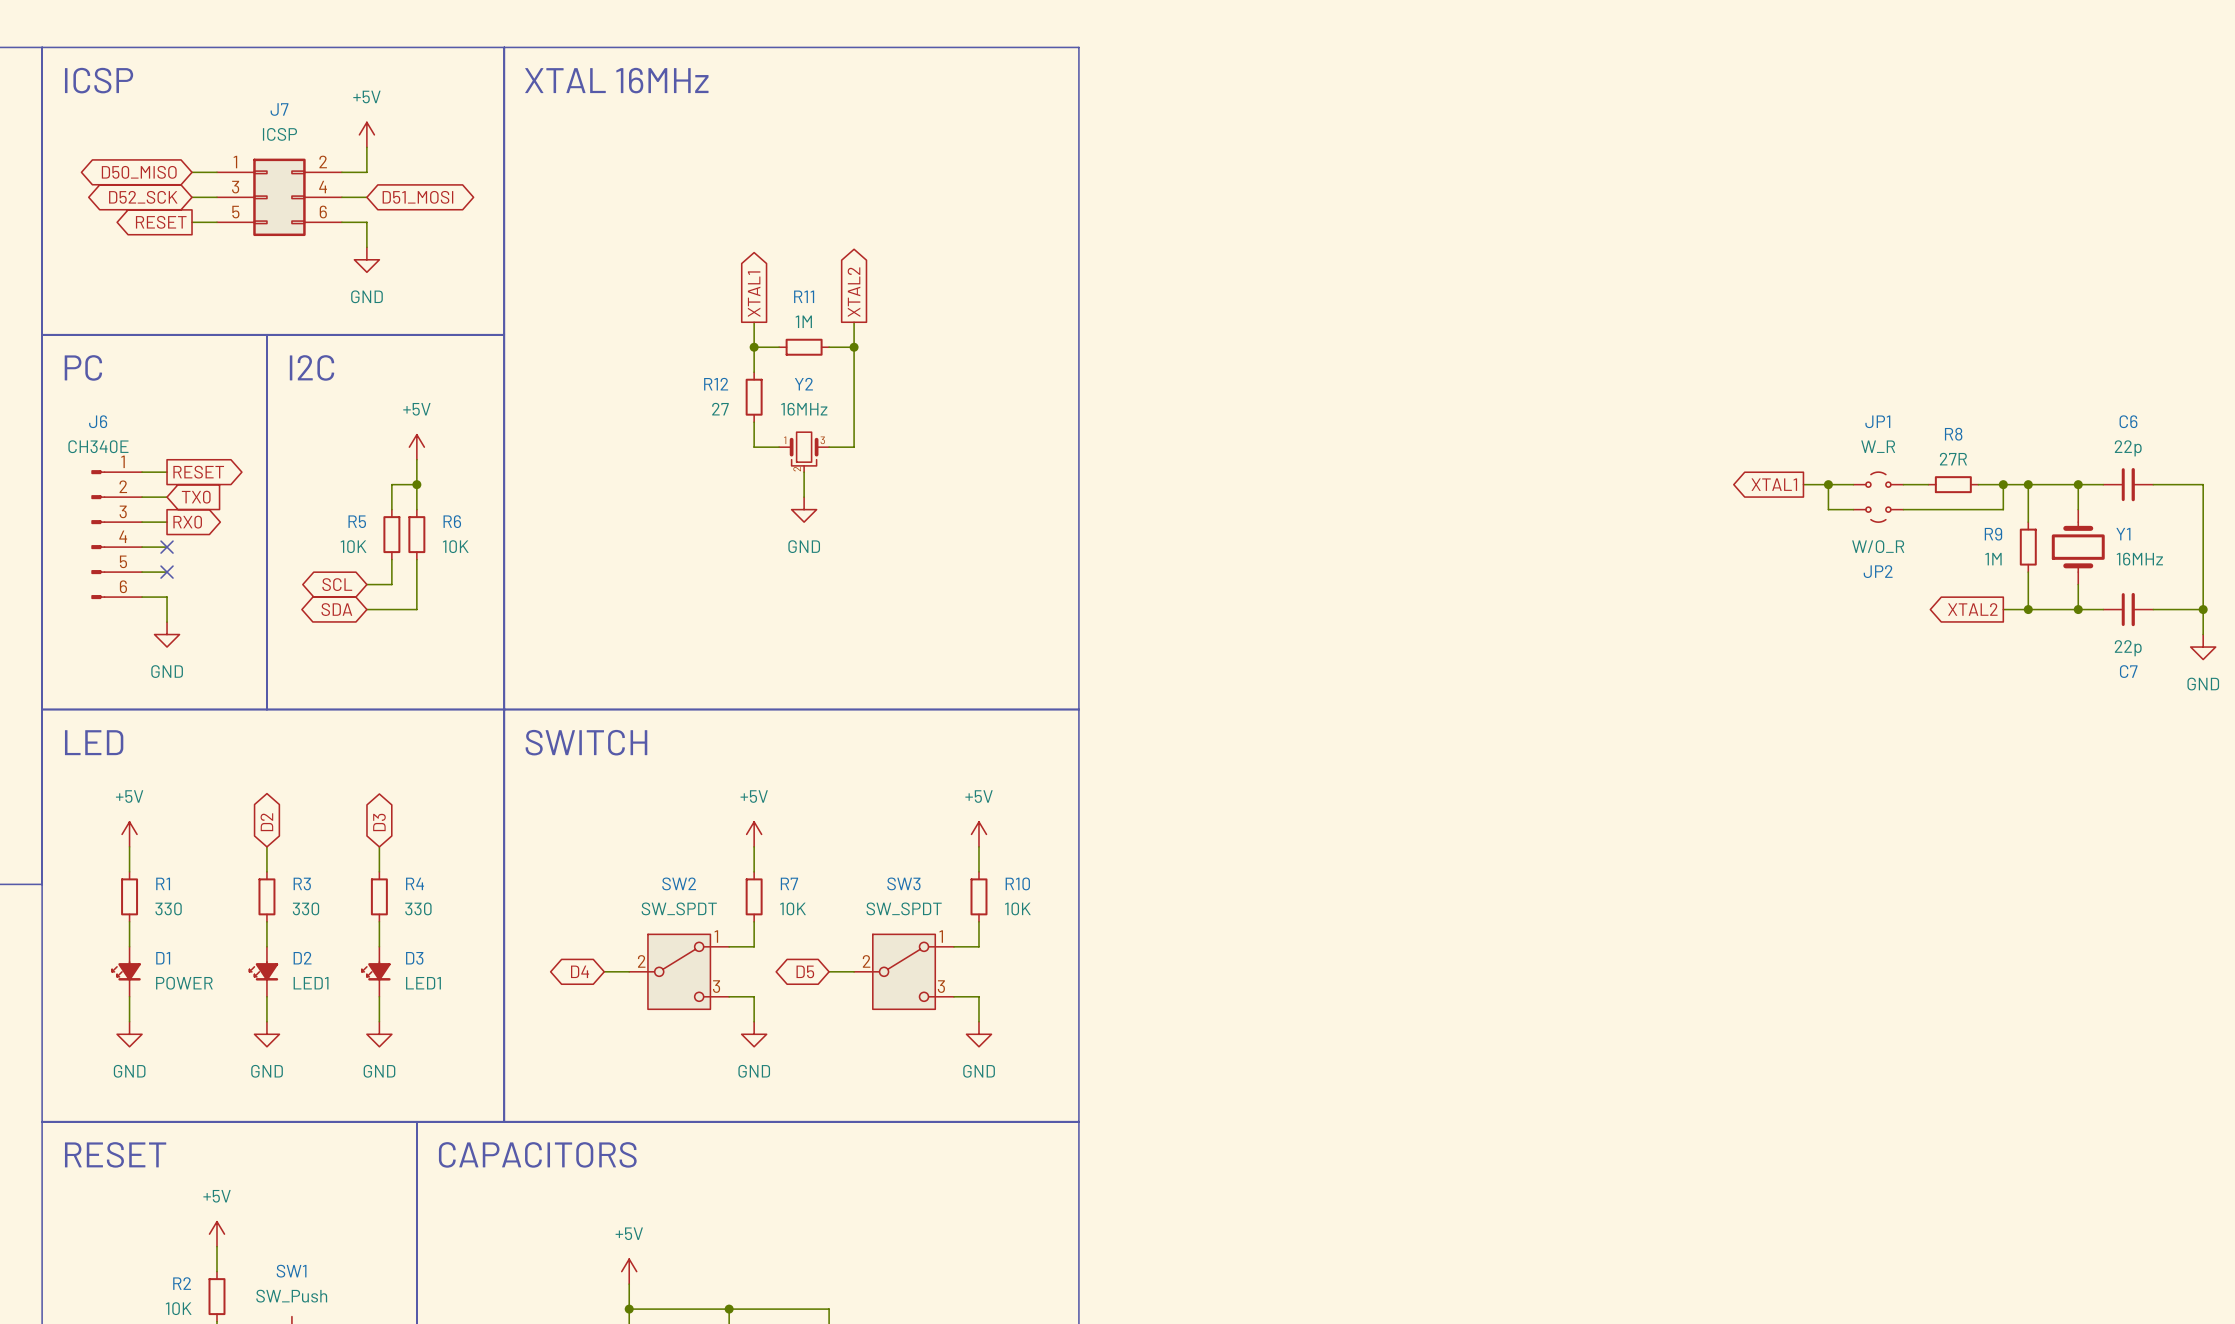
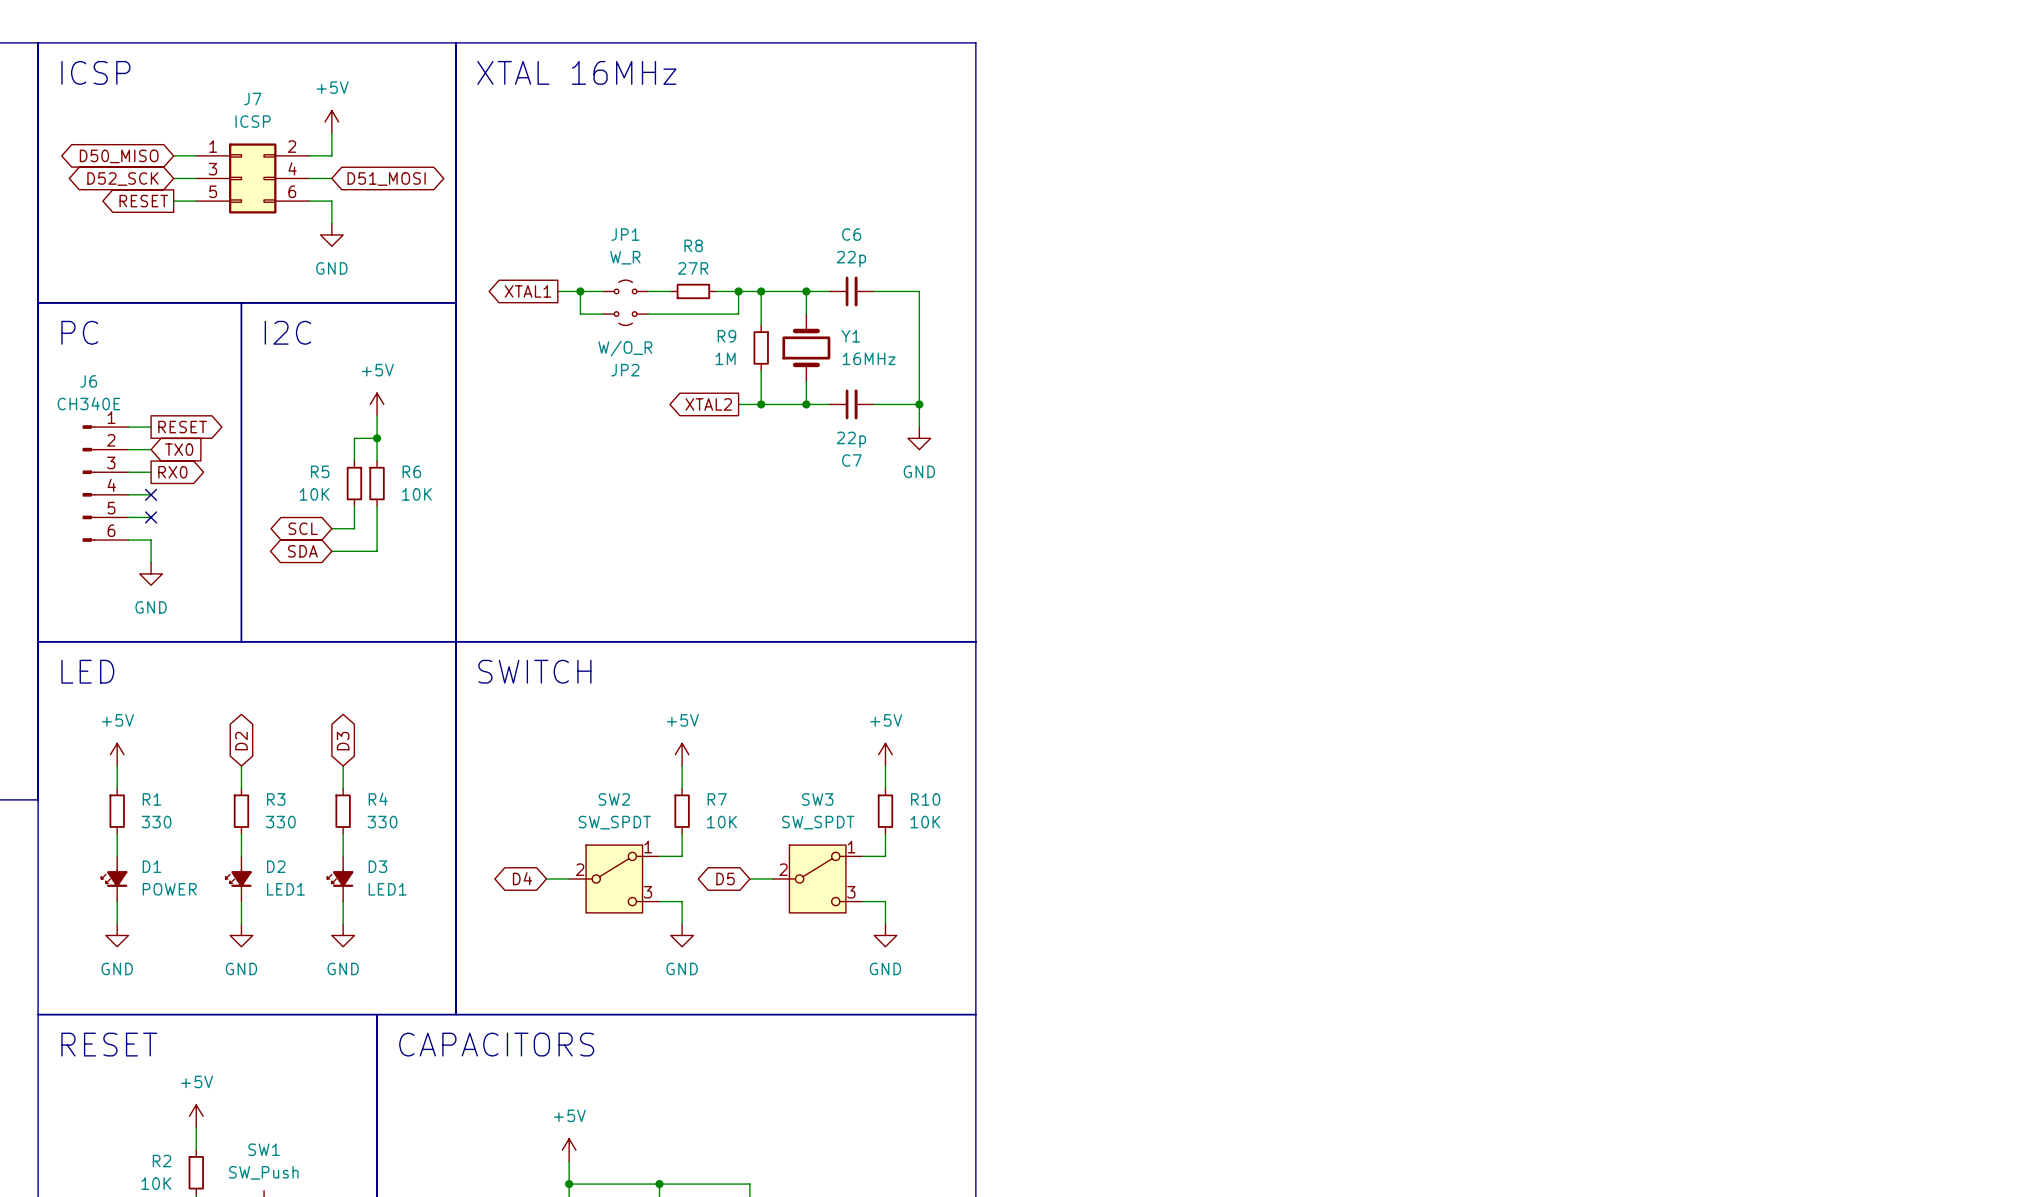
global label rotation: 0° (854, 292) -> 90° counterclockwise (708, 404)
global label position: XTAL2 (854, 292) -> XTAL2 (708, 404)
global label rotation: 0° (754, 294) -> 90° counterclockwise (527, 291)
global label position: XTAL1 (754, 294) -> XTAL1 (527, 291)
wire: none -> (557, 291) (603, 291)
junction: none -> (580, 291)
wire: (754, 322) (754, 372) -> none
wire: none -> (715, 291) (828, 291)
wire: none -> (738, 291) (738, 314) (704, 314)
junction: none -> (738, 291)
wire: none -> (761, 291) (761, 325)
junction: none -> (761, 291)
wire: (854, 322) (854, 447) -> (828, 404) (772, 404)
wire: none -> (806, 291) (806, 314)
junction: none -> (806, 291)
wire: none -> (874, 291) (919, 291) (919, 427)
wire: none -> (648, 314) (682, 314)
junction: (754, 347) -> none
R11: 1M (804, 347) -> none
wire: (829, 347) (854, 347) -> (648, 291) (670, 291)
junction: (854, 347) -> none
R12: 27 (754, 397) -> none
wire: none -> (761, 370) (761, 404)
wire: (754, 422) (754, 447) (779, 447) -> (580, 291) (580, 314) (603, 314)
junction: none -> (761, 404)
junction: none -> (806, 404)
wire: none -> (874, 404) (919, 404)
junction: none -> (919, 404)
Y2: 16MHz (804, 452) -> none
wire: (804, 472) (804, 497) -> (806, 381) (806, 404)
JP1 position: (1878, 479) -> (625, 286)
global label: XTAL1 (1774, 484) -> none
wire: (1803, 484) (1853, 484) -> none
wire: (1828, 484) (1828, 509) (1853, 509) -> none
junction: (1828, 484) -> none
wire: (1903, 484) (1928, 484) -> none
R8 position: (1953, 484) -> (693, 291)
wire: (1978, 484) (2103, 484) -> none
wire: (2003, 484) (2003, 509) (1903, 509) -> none
junction: (2003, 484) -> none
wire: (2028, 484) (2028, 522) -> none
junction: (2028, 484) -> none
wire: (2078, 484) (2078, 509) -> none
junction: (2078, 484) -> none
C6 position: (2128, 484) -> (851, 291)
wire: (2153, 484) (2203, 484) (2203, 634) -> none
power symbol position: GND (804, 509) -> GND (919, 438)
JP2 position: (1878, 514) -> (625, 318)
R9 position: (2028, 547) -> (761, 347)
Y1 position: (2078, 547) -> (806, 347)
wire: (2028, 572) (2028, 609) -> none
wire: (2078, 584) (2078, 609) -> none
global label: XTAL2 (1972, 609) -> none
wire: (2003, 609) (2103, 609) -> none
junction: (2028, 609) -> none
junction: (2078, 609) -> none
C7 position: (2128, 609) -> (851, 404)
wire: (2153, 609) (2203, 609) -> none
junction: (2203, 609) -> none
power symbol: GND (2203, 647) -> none

